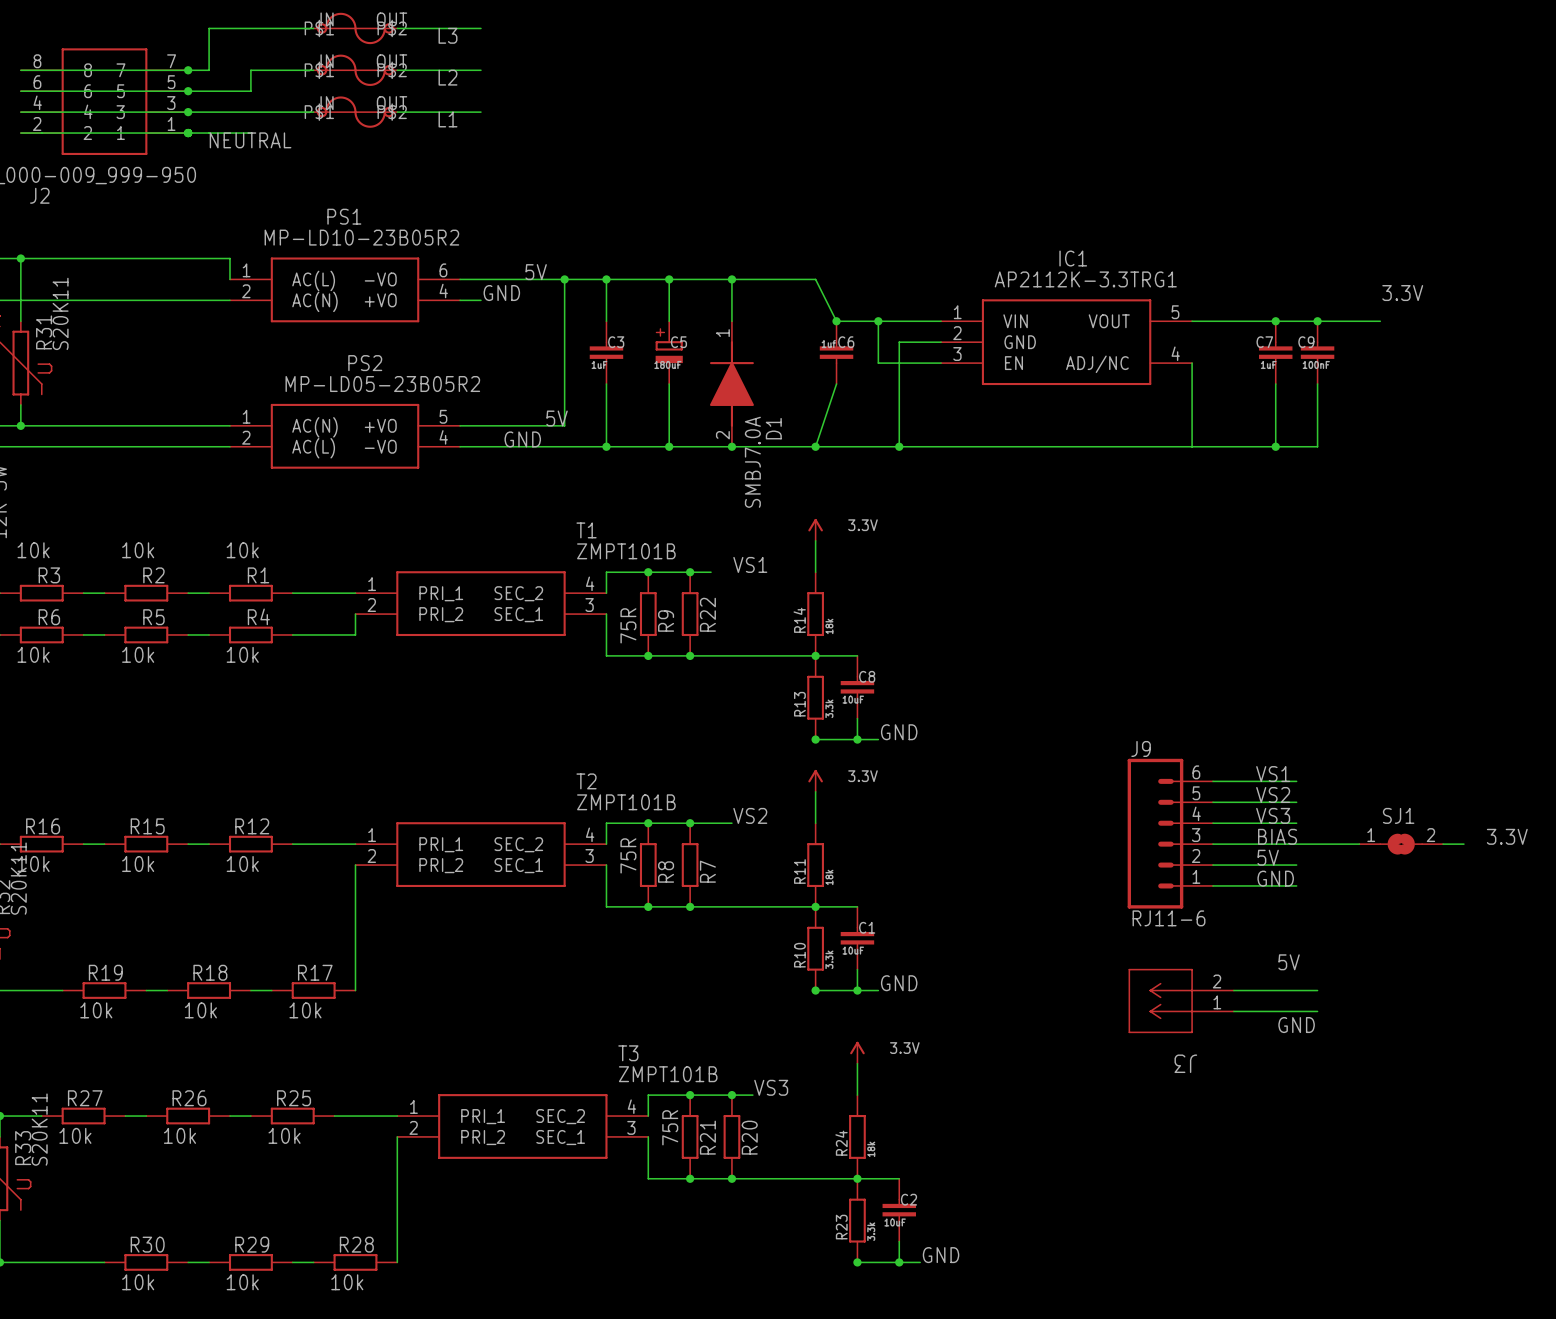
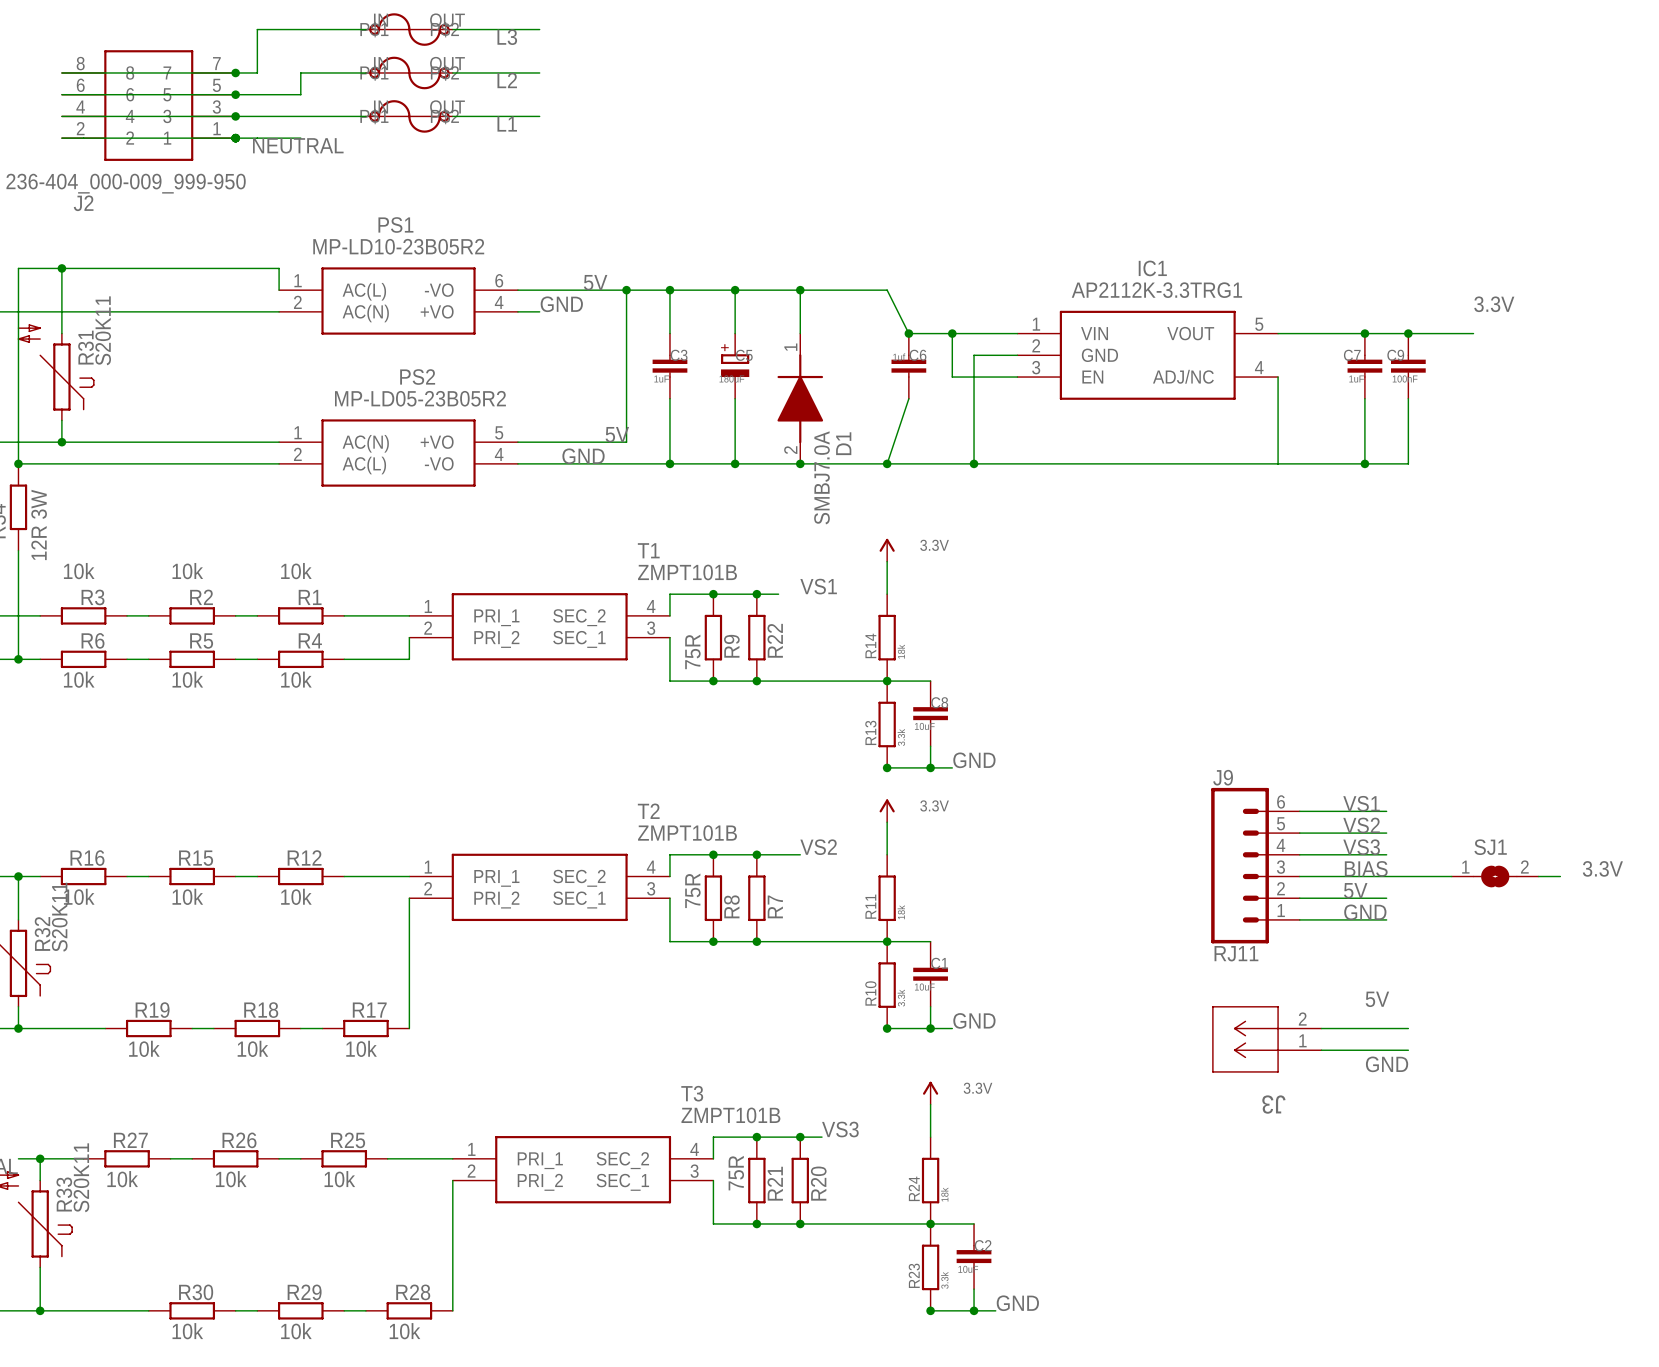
J9 value: RJ11-6 (1169, 918) -> RJ11 (1236, 953)

